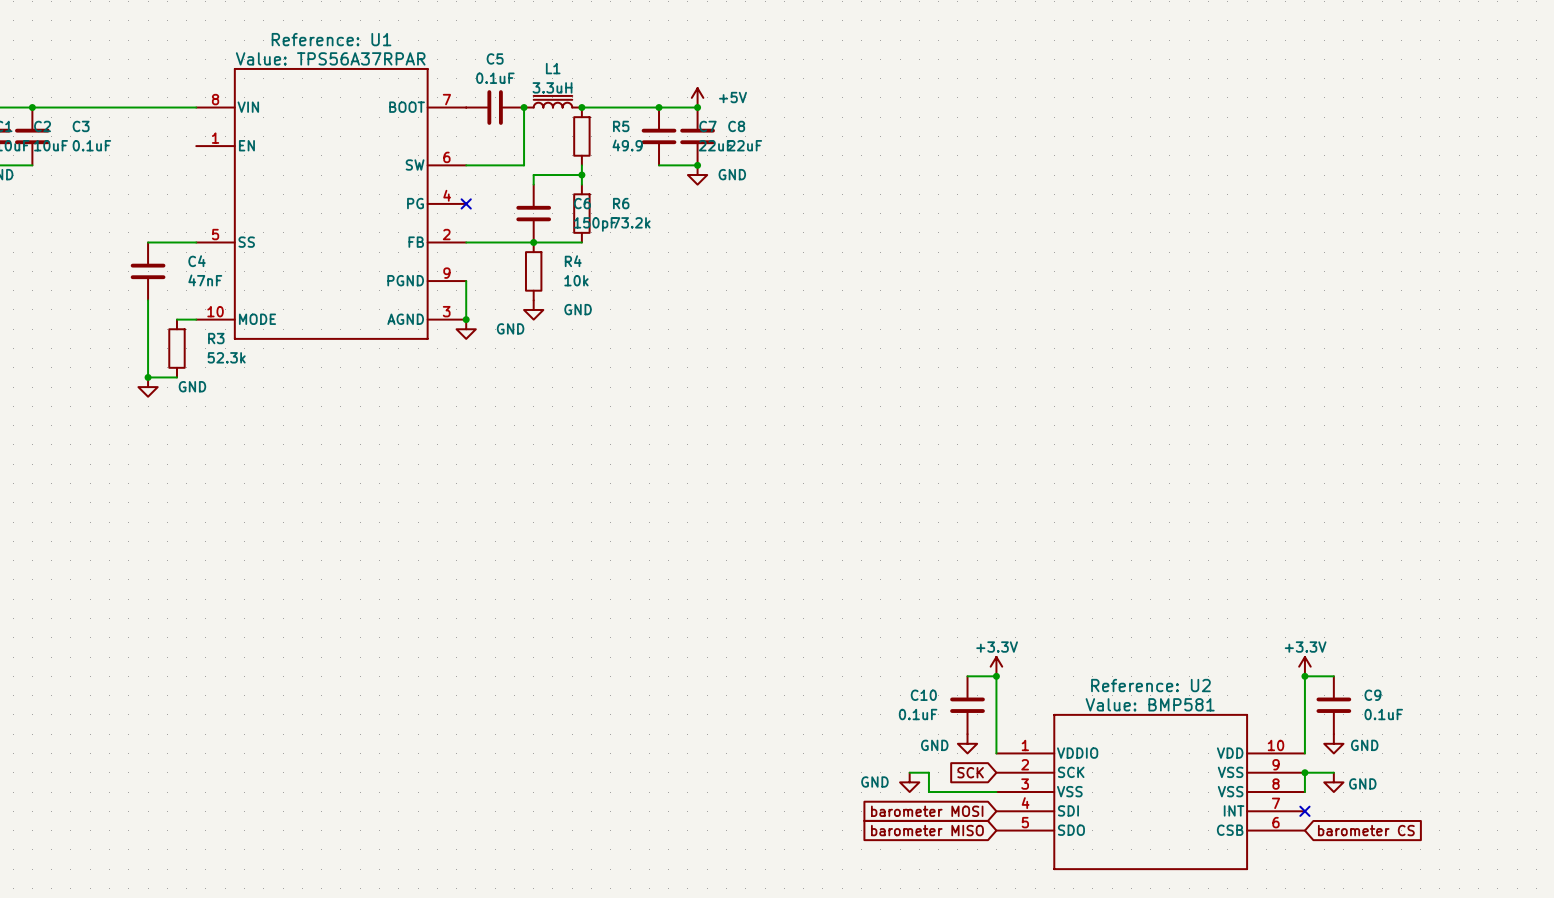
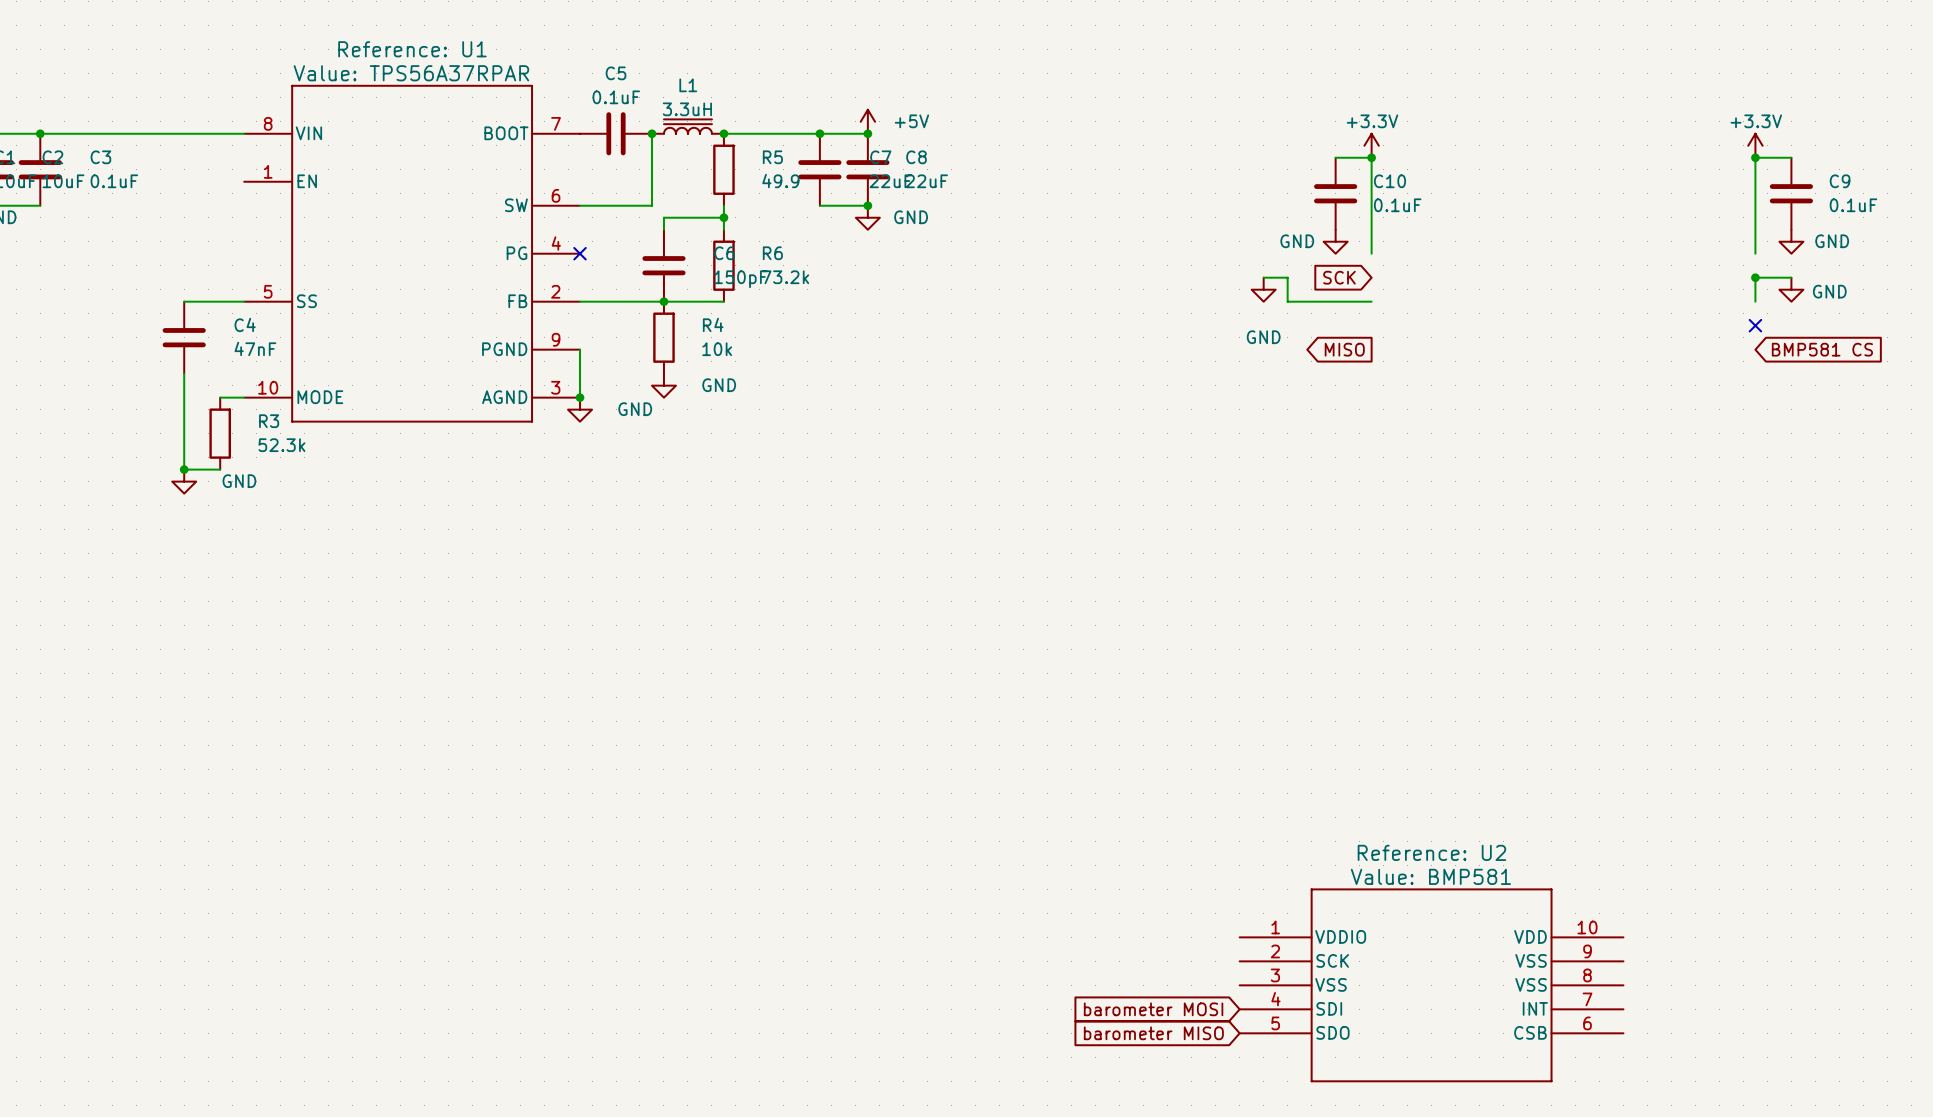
power symbol: none -> +3.3V (1371, 145)
power symbol: none -> +3.3V (1755, 145)
wire: none -> (1335, 157) (1371, 157) (1371, 253)
junction: none -> (1371, 157)
junction: none -> (1755, 157)
wire: none -> (1791, 157) (1755, 157) (1755, 253)
power symbol: none -> GND (1335, 241)
power symbol: none -> GND (1791, 241)
wire: none -> (1263, 277) (1287, 277) (1287, 301) (1371, 301)
global label: none -> SCK (1339, 277)
junction: none -> (1755, 277)
wire: none -> (1791, 277) (1755, 277) (1755, 301)
power symbol: none -> GND (1263, 289)
power symbol: none -> GND (1791, 289)
no-connect mark: none -> (1755, 325)
global label: none -> MISO (1344, 349)
global label: none -> BMP581 CS (1822, 349)
power symbol: +3.3V (996, 666) -> none
power symbol: +3.3V (1304, 666) -> none
wire: (967, 676) (996, 676) (996, 753) -> none
junction: (996, 676) -> none
junction: (1304, 676) -> none
wire: (1333, 676) (1304, 676) (1304, 753) -> none
C10 name position: C10 (923, 695) -> C10 (1389, 181)
C10 position: (967, 705) -> (1335, 193)
C9 position: (1333, 705) -> (1791, 193)
C10 value position: 0.1uF (918, 714) -> 0.1uF (1397, 205)
power symbol: GND (967, 743) -> none
power symbol: GND (1333, 743) -> none
wire: (909, 772) (928, 772) (928, 792) (996, 792) -> none
global label: SCK (970, 772) -> none
junction: (1304, 772) -> none
wire: (1333, 772) (1304, 772) (1304, 792) -> none
power symbol: GND (909, 782) -> none
power symbol: GND (1333, 782) -> none
no-connect mark: (1304, 811) -> none
global label: barometer CS (1366, 830) -> none

